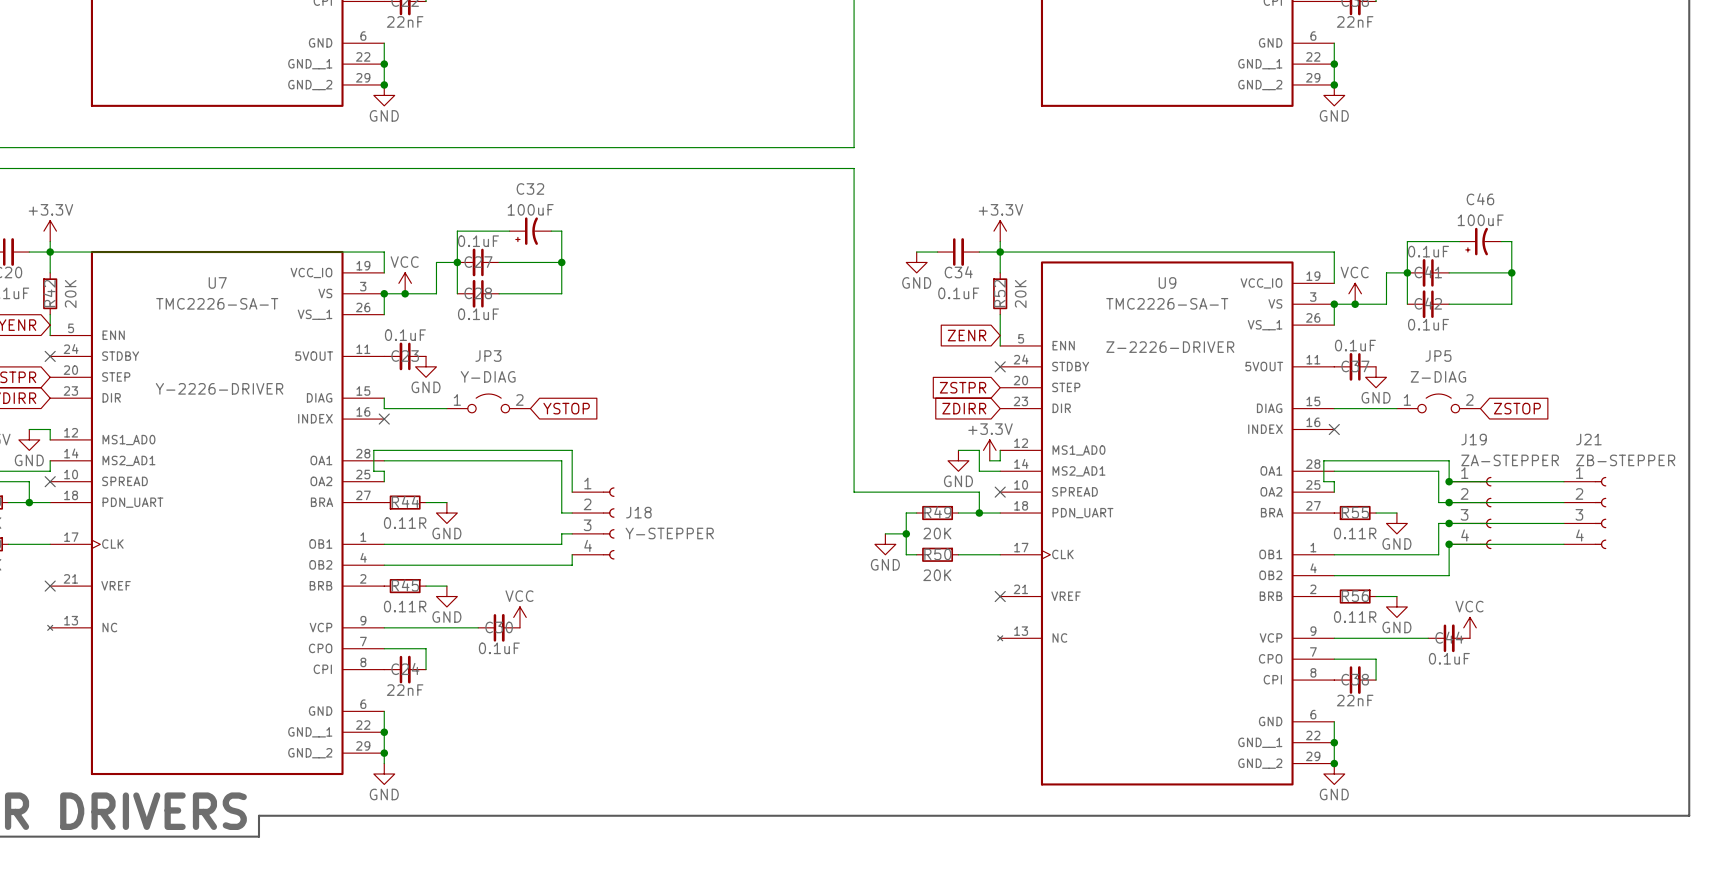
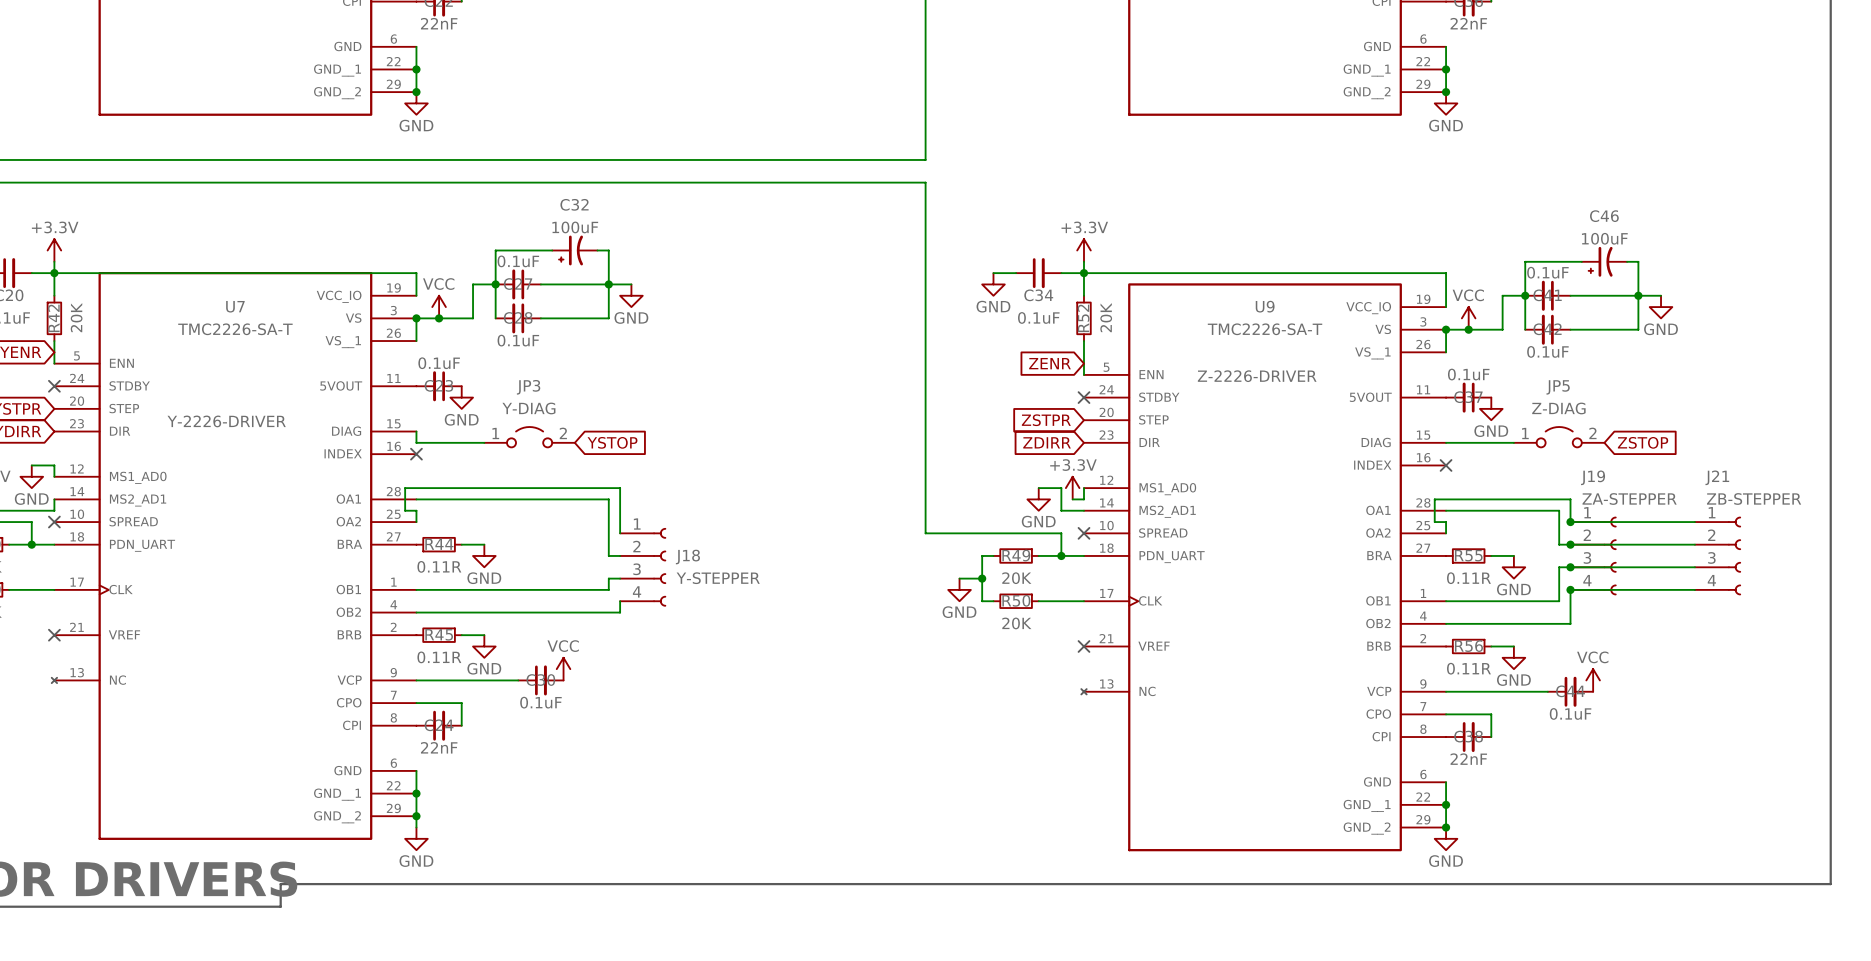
wire: none -> (608, 284) (631, 284)
power symbol: none -> GND (631, 295)
wire: none -> (1638, 295) (1661, 295)
power symbol: none -> GND (1661, 307)

